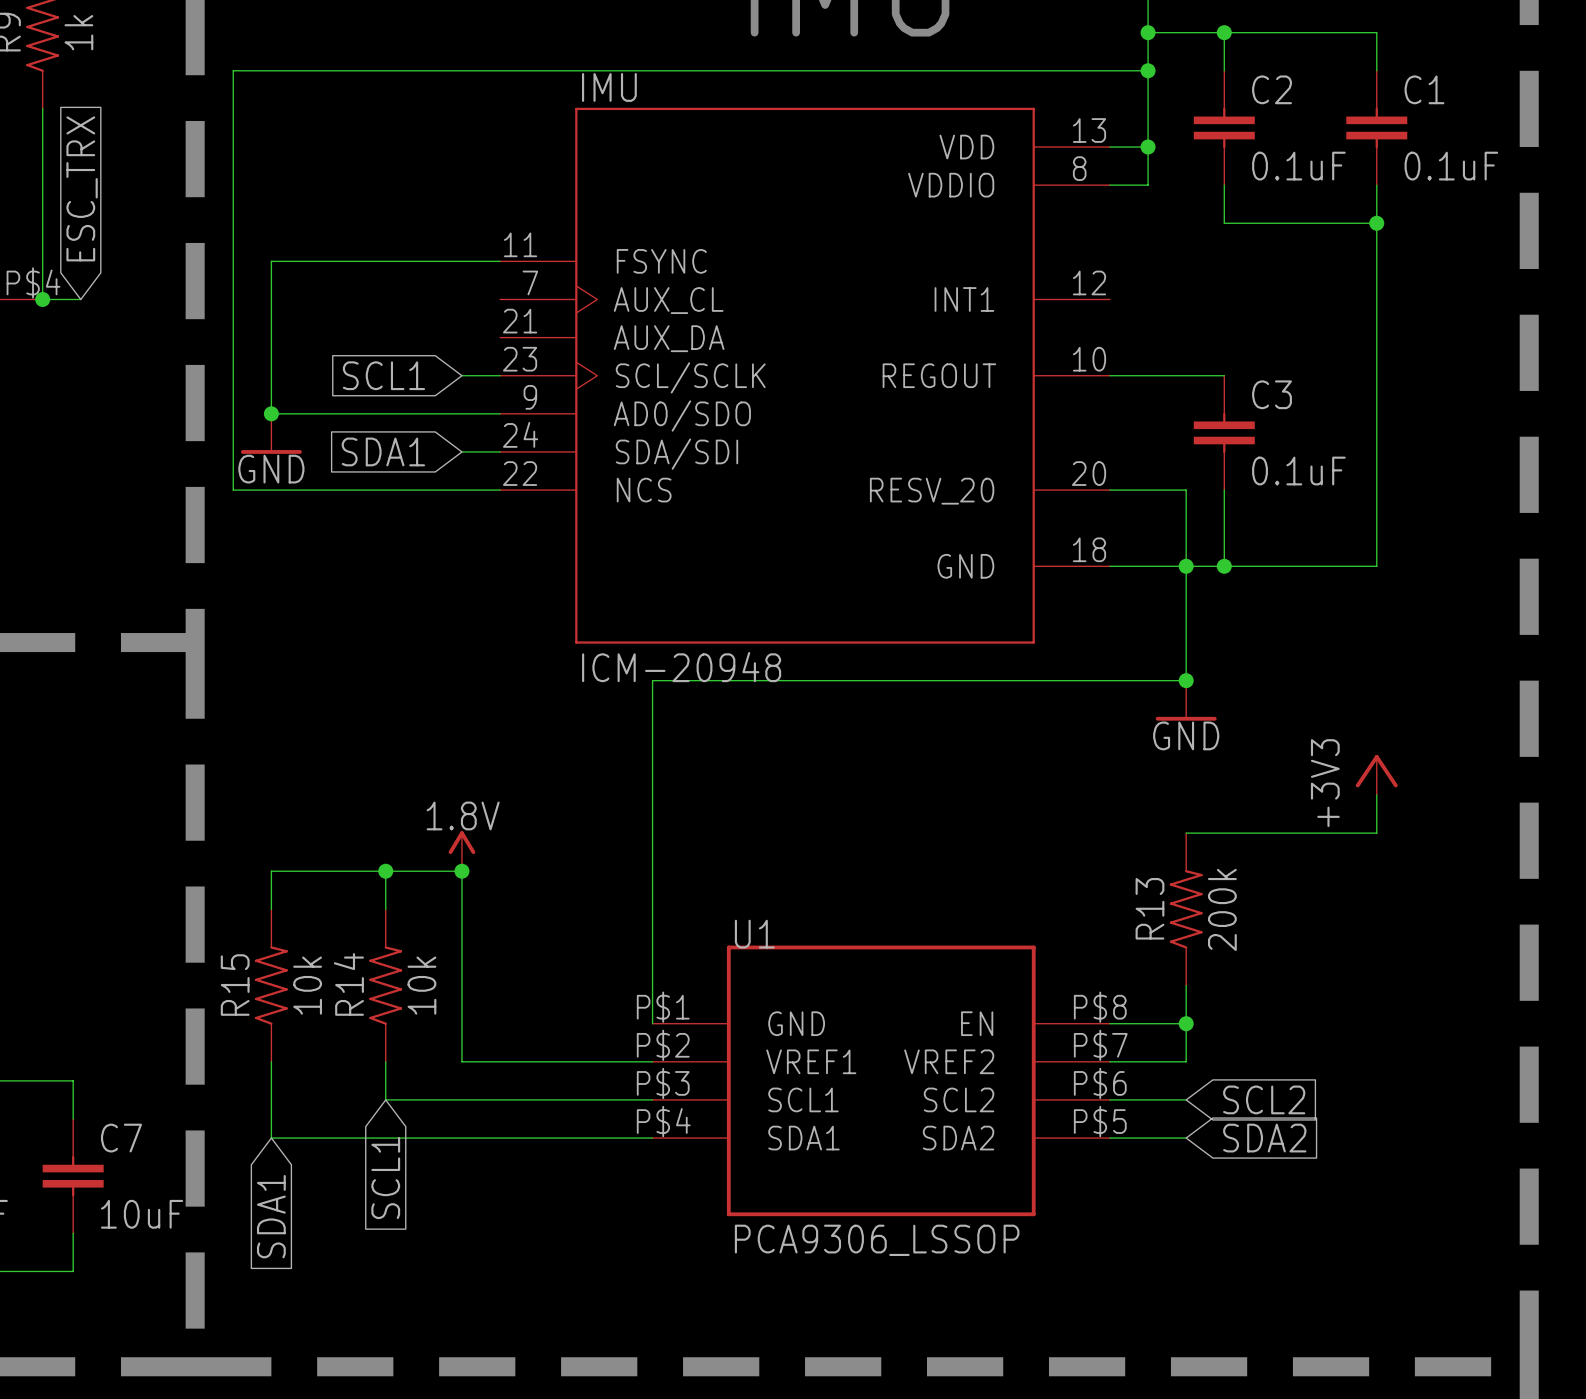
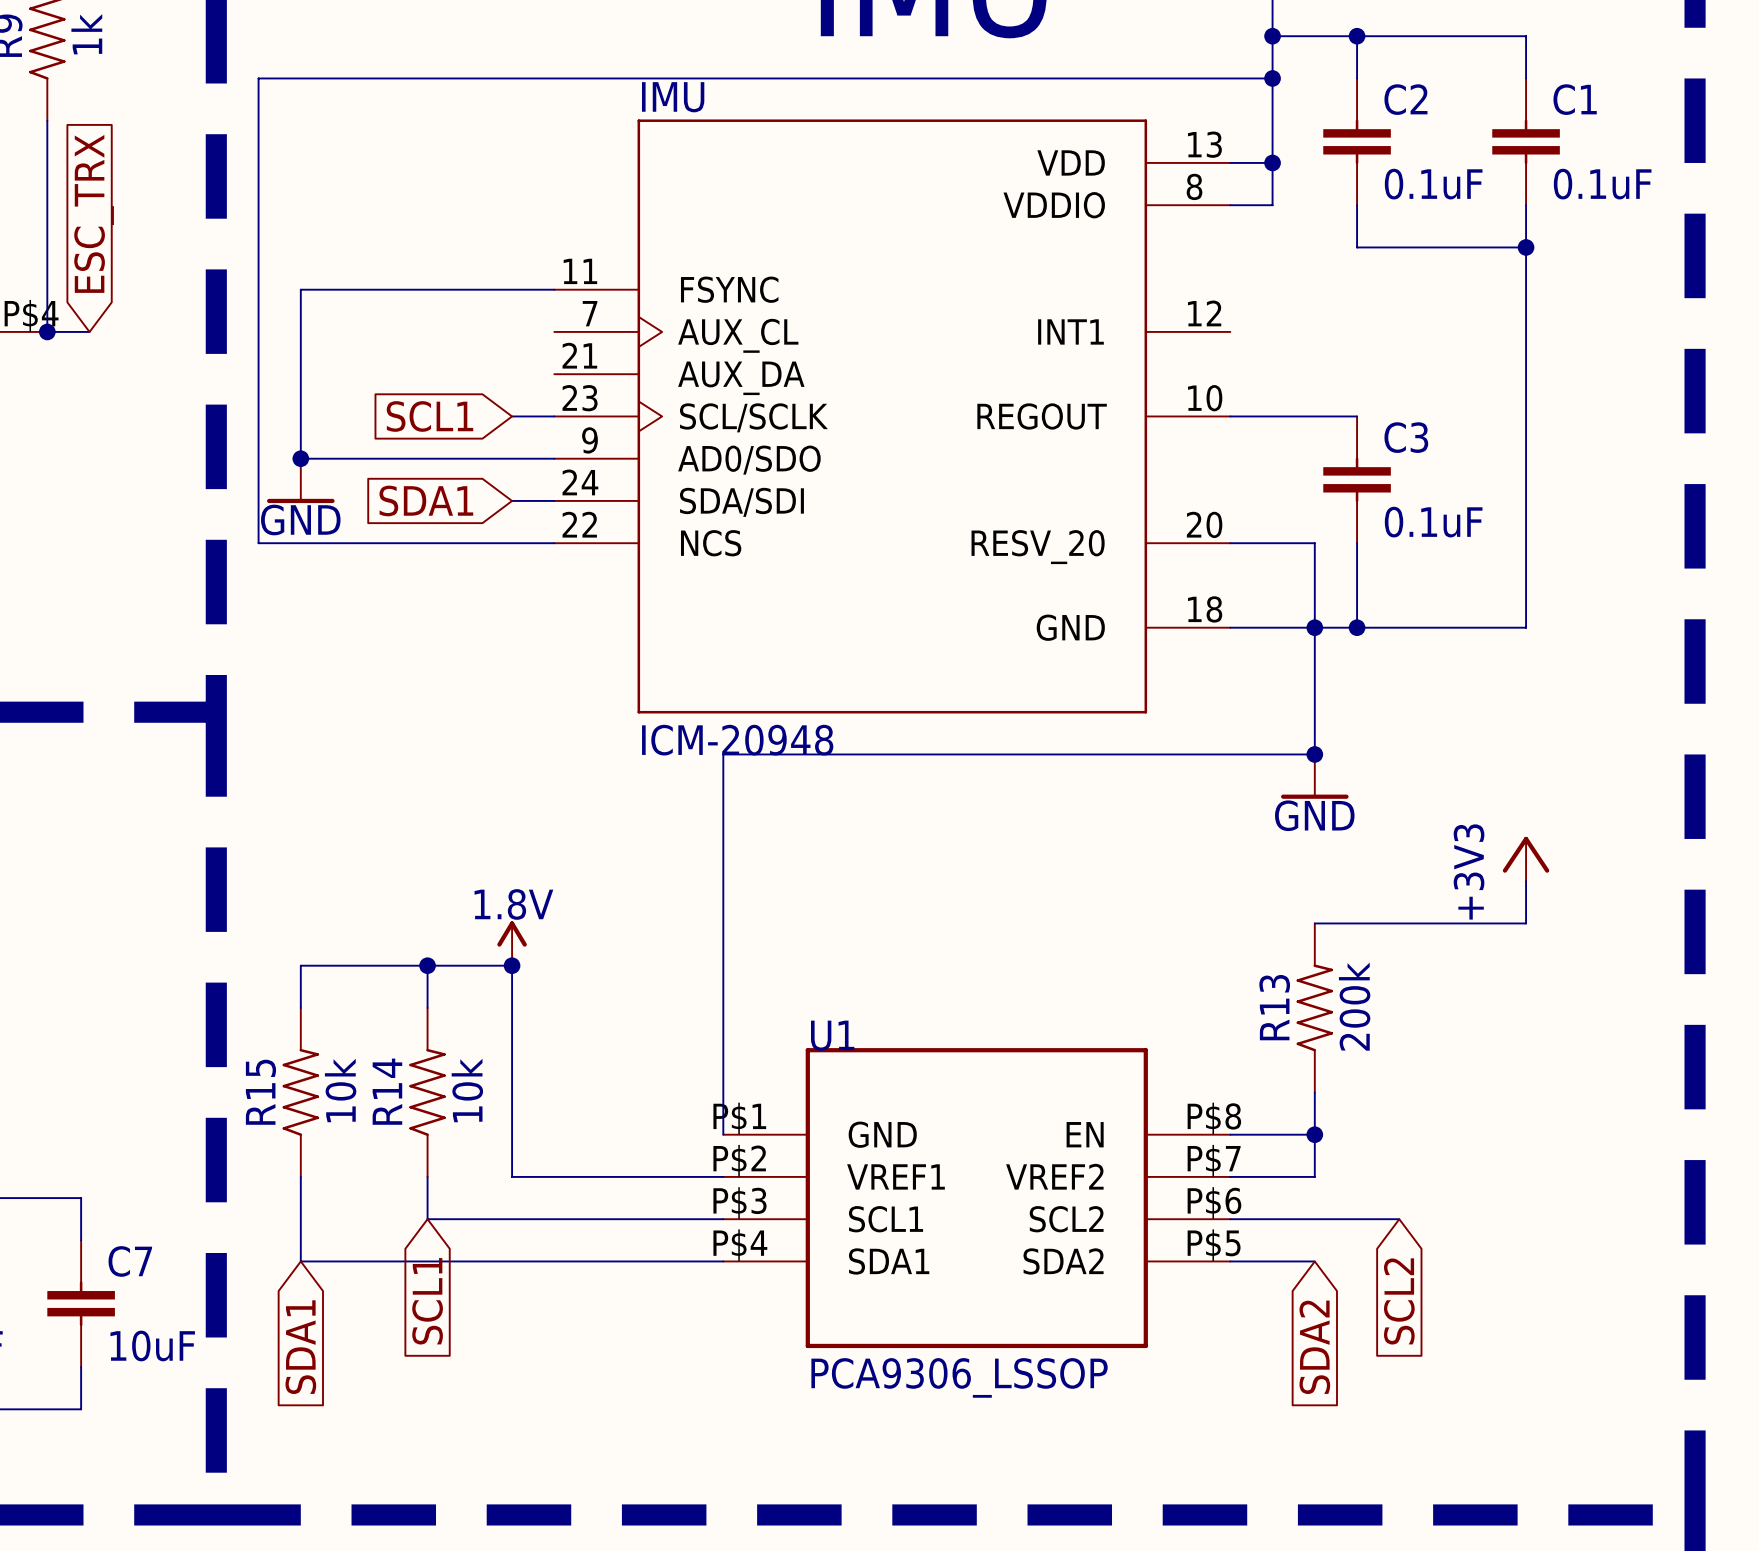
wire: none -> (1314, 1219) (1399, 1219)
global label rotation: 0° (1264, 1099) -> 90° clockwise (1399, 1301)
global label rotation: 0° (1264, 1138) -> 90° clockwise (1314, 1347)

